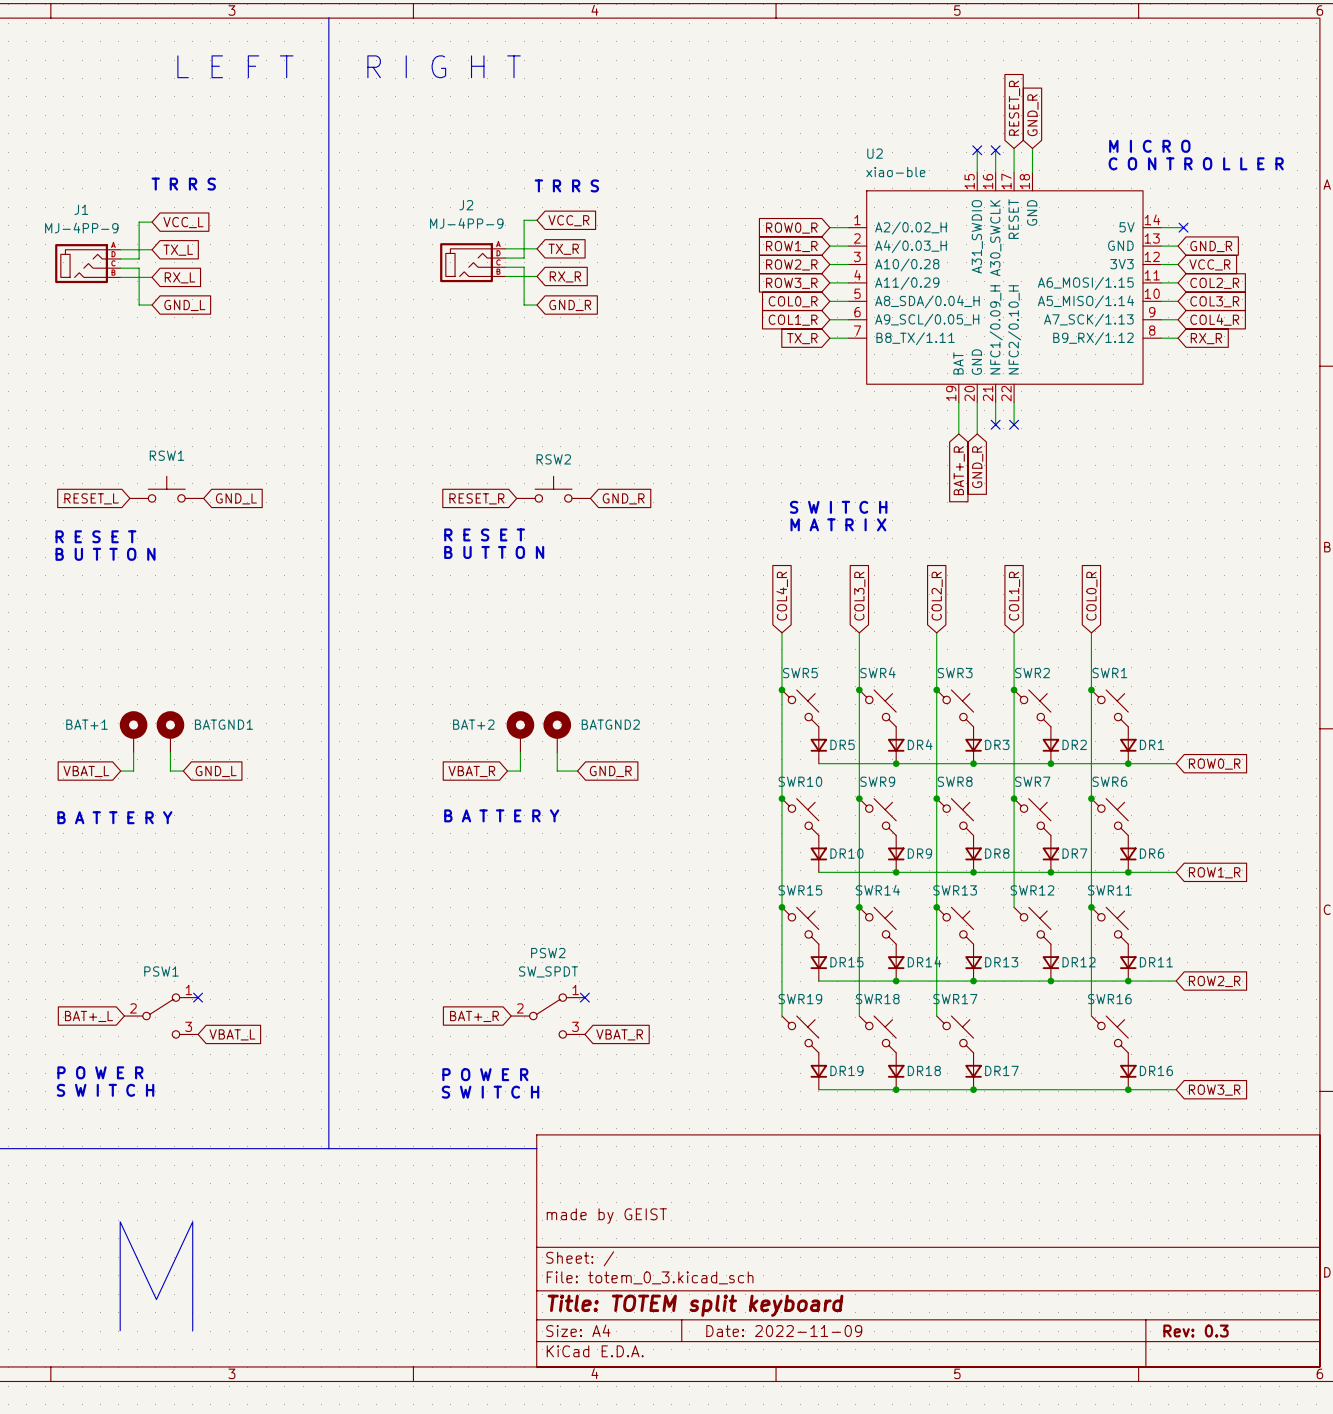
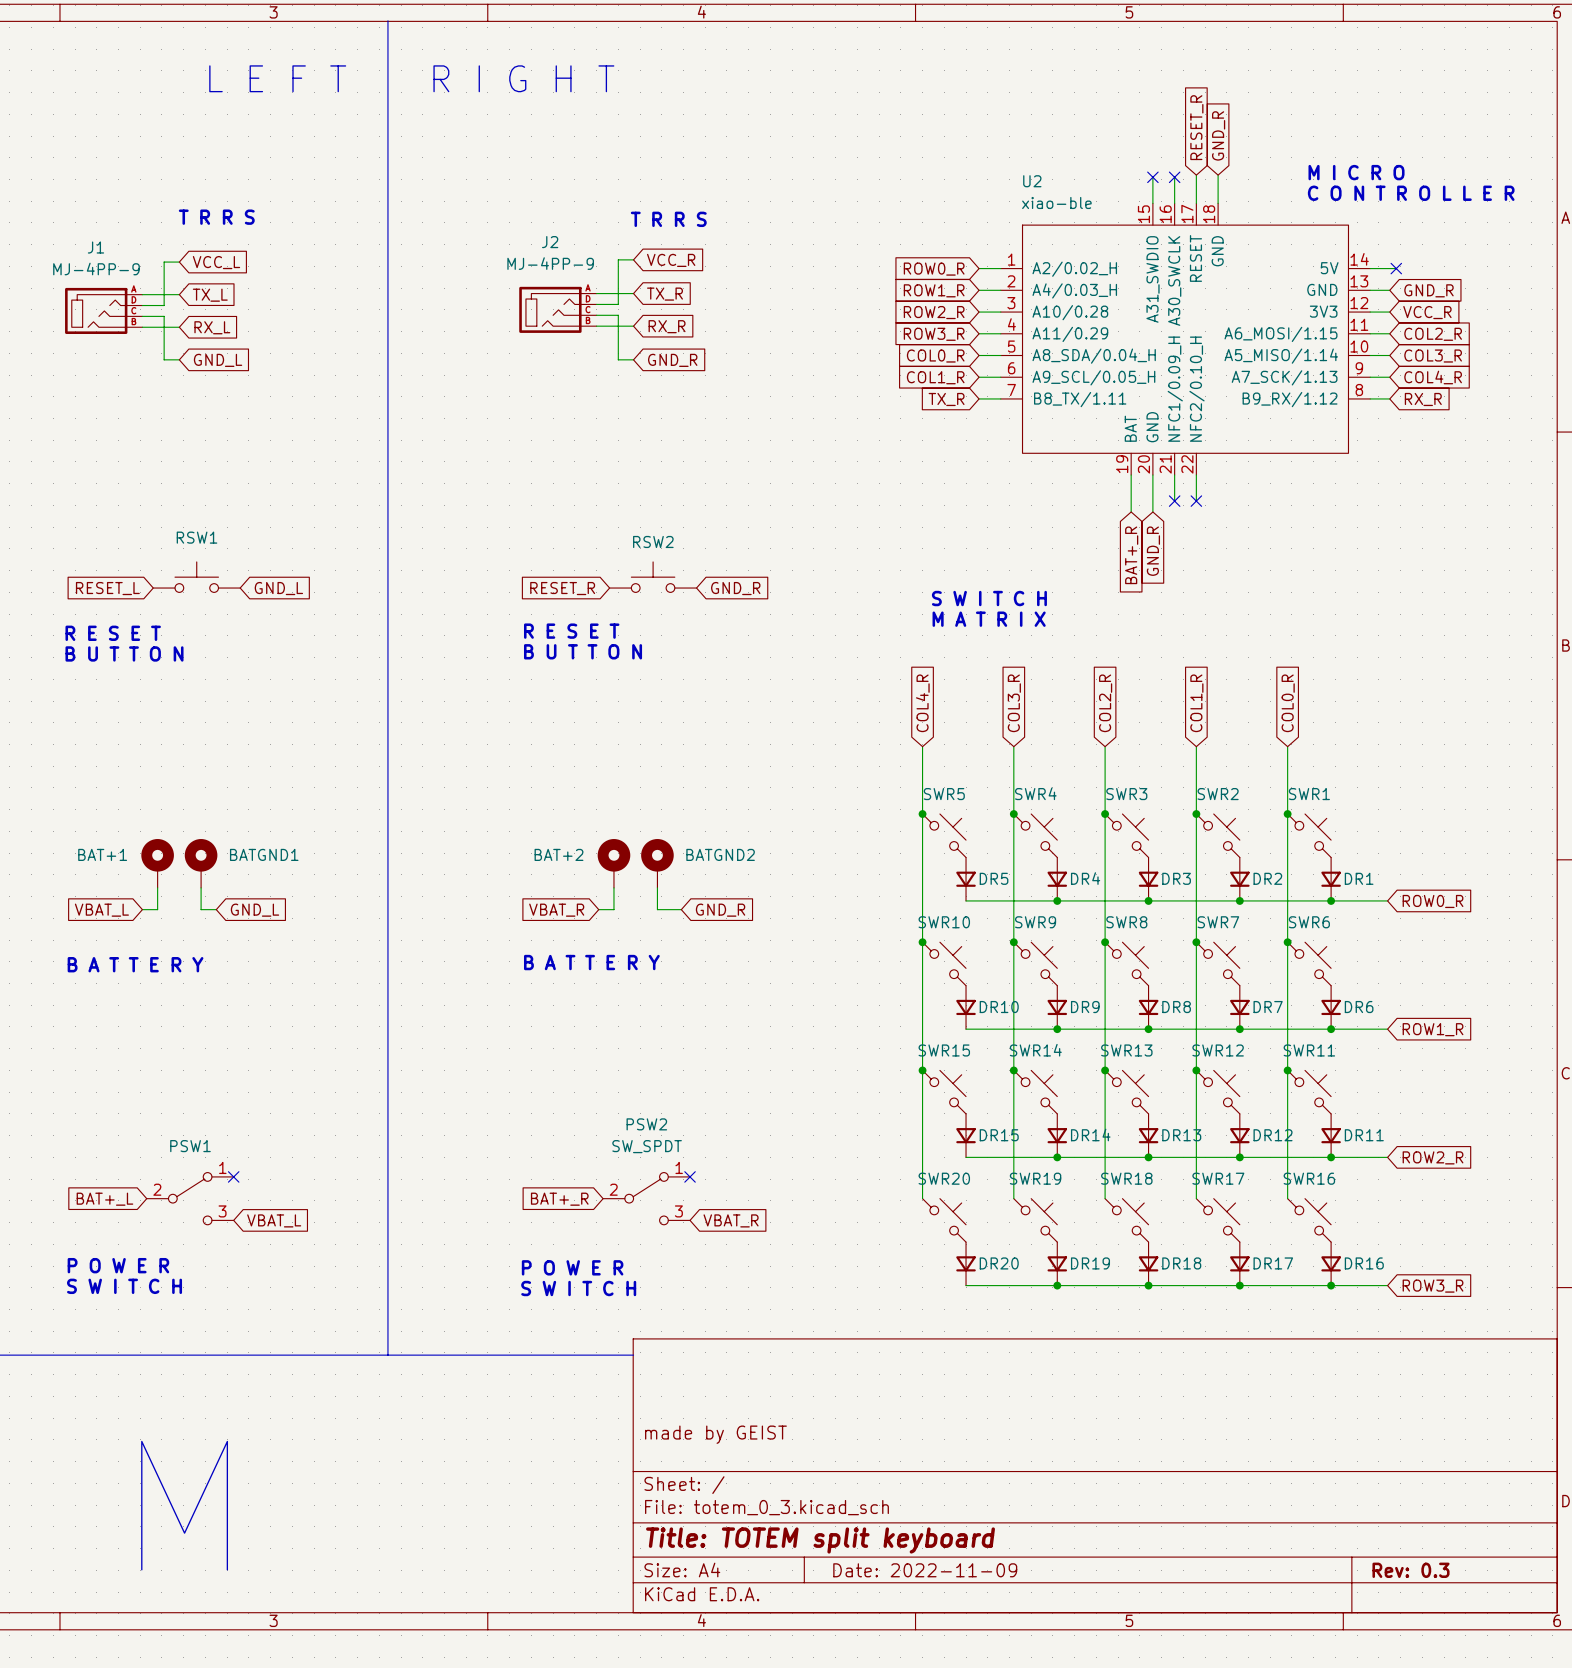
wire: none -> (1196, 1070) (1196, 1198)
junction: none -> (1196, 1070)
SWR19 name: SWR19 (800, 999) -> SWR20 (944, 1178)
SWR18 name: SWR18 (877, 999) -> SWR19 (1035, 1178)
SWR17 name: SWR17 (955, 999) -> SWR18 (1126, 1178)
SWR17: none -> (1218, 1220)
DR19 name: DR19 (846, 1070) -> DR20 (999, 1263)
DR18 name: DR18 (924, 1070) -> DR19 (1090, 1263)
DR17 name: DR17 (1001, 1070) -> DR18 (1181, 1263)
DR17: none -> (1239, 1263)
junction: none -> (1239, 1285)

